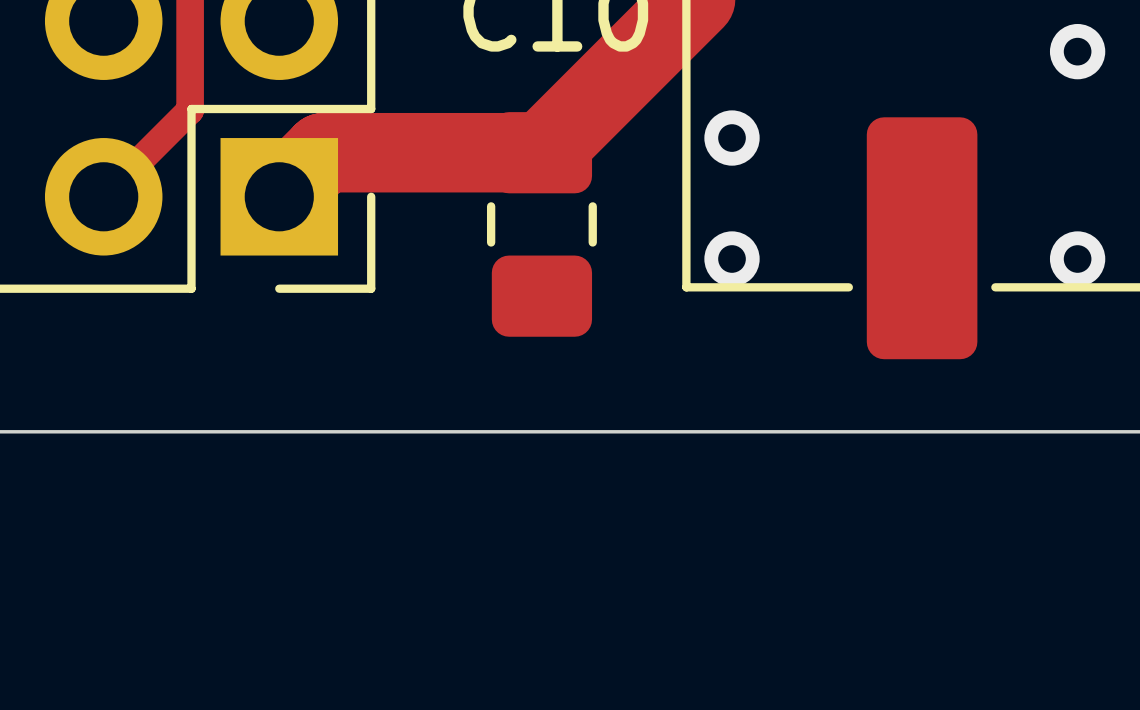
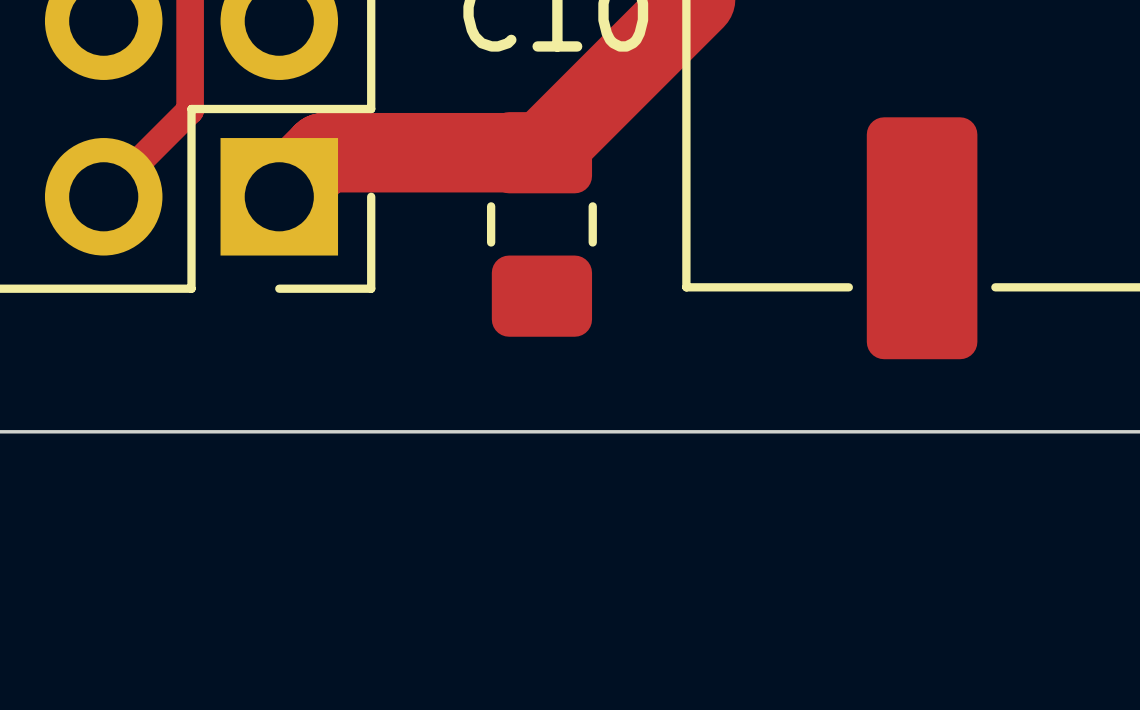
via: (1077, 51) -> none
via: (732, 138) -> none
via: (732, 258) -> none
via: (1077, 258) -> none

